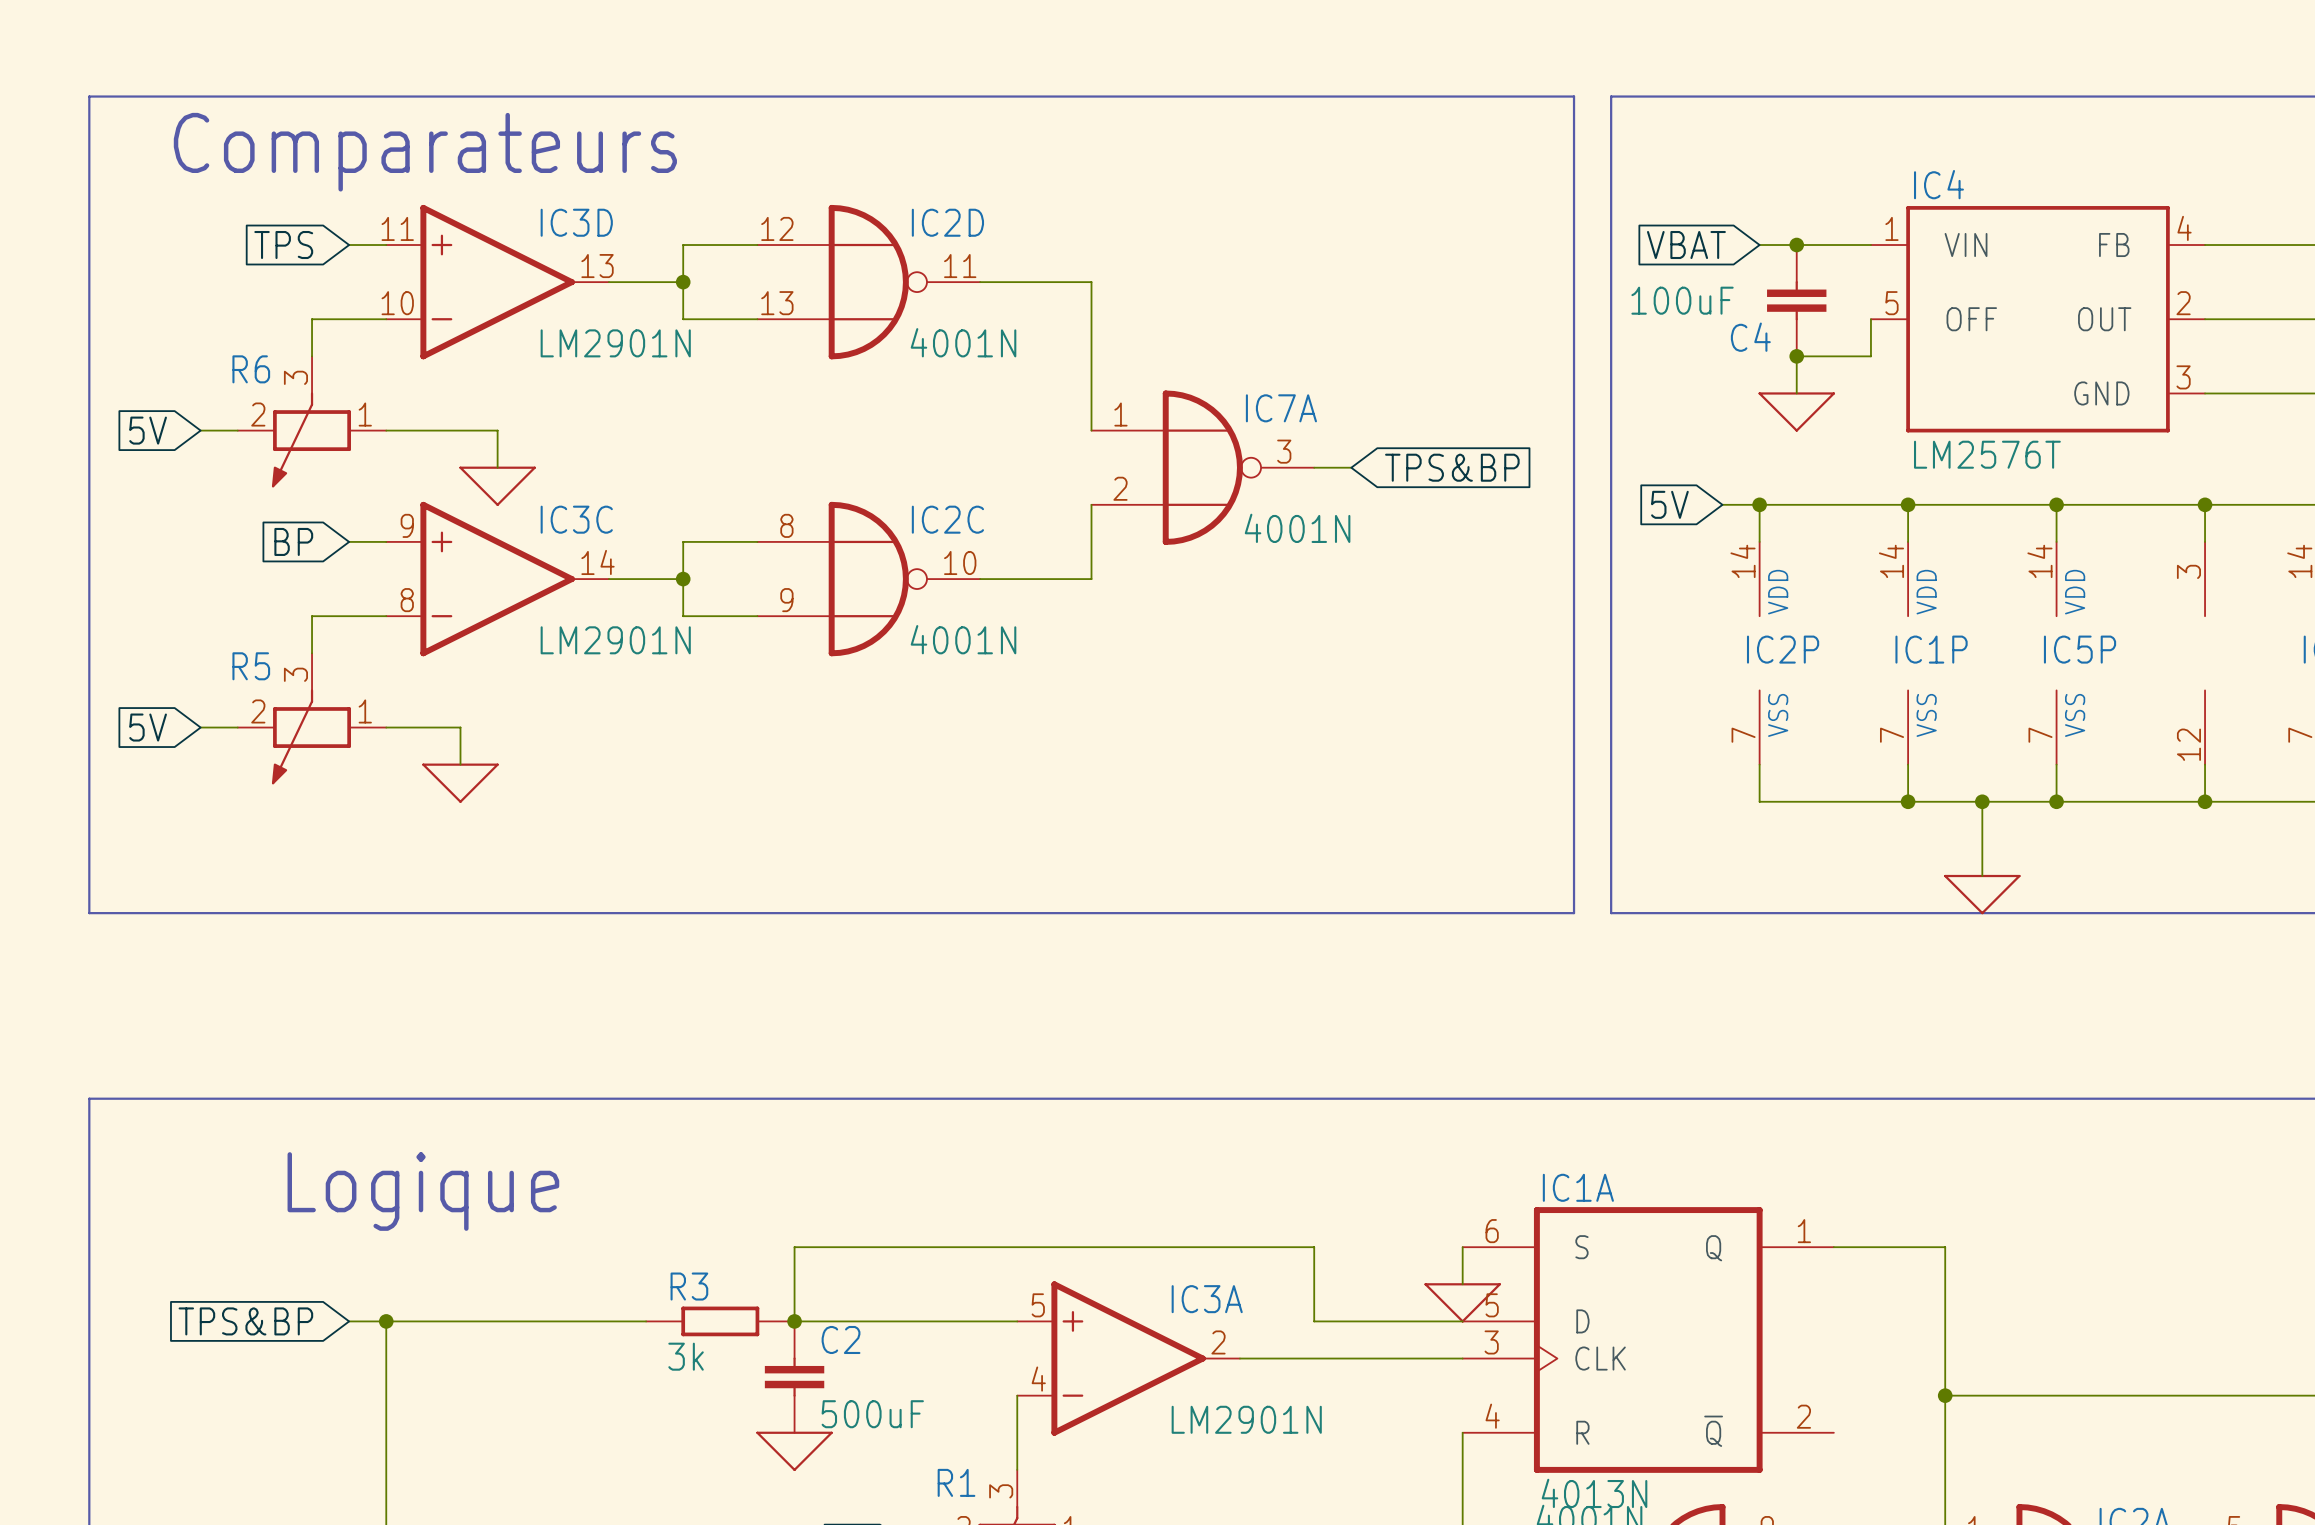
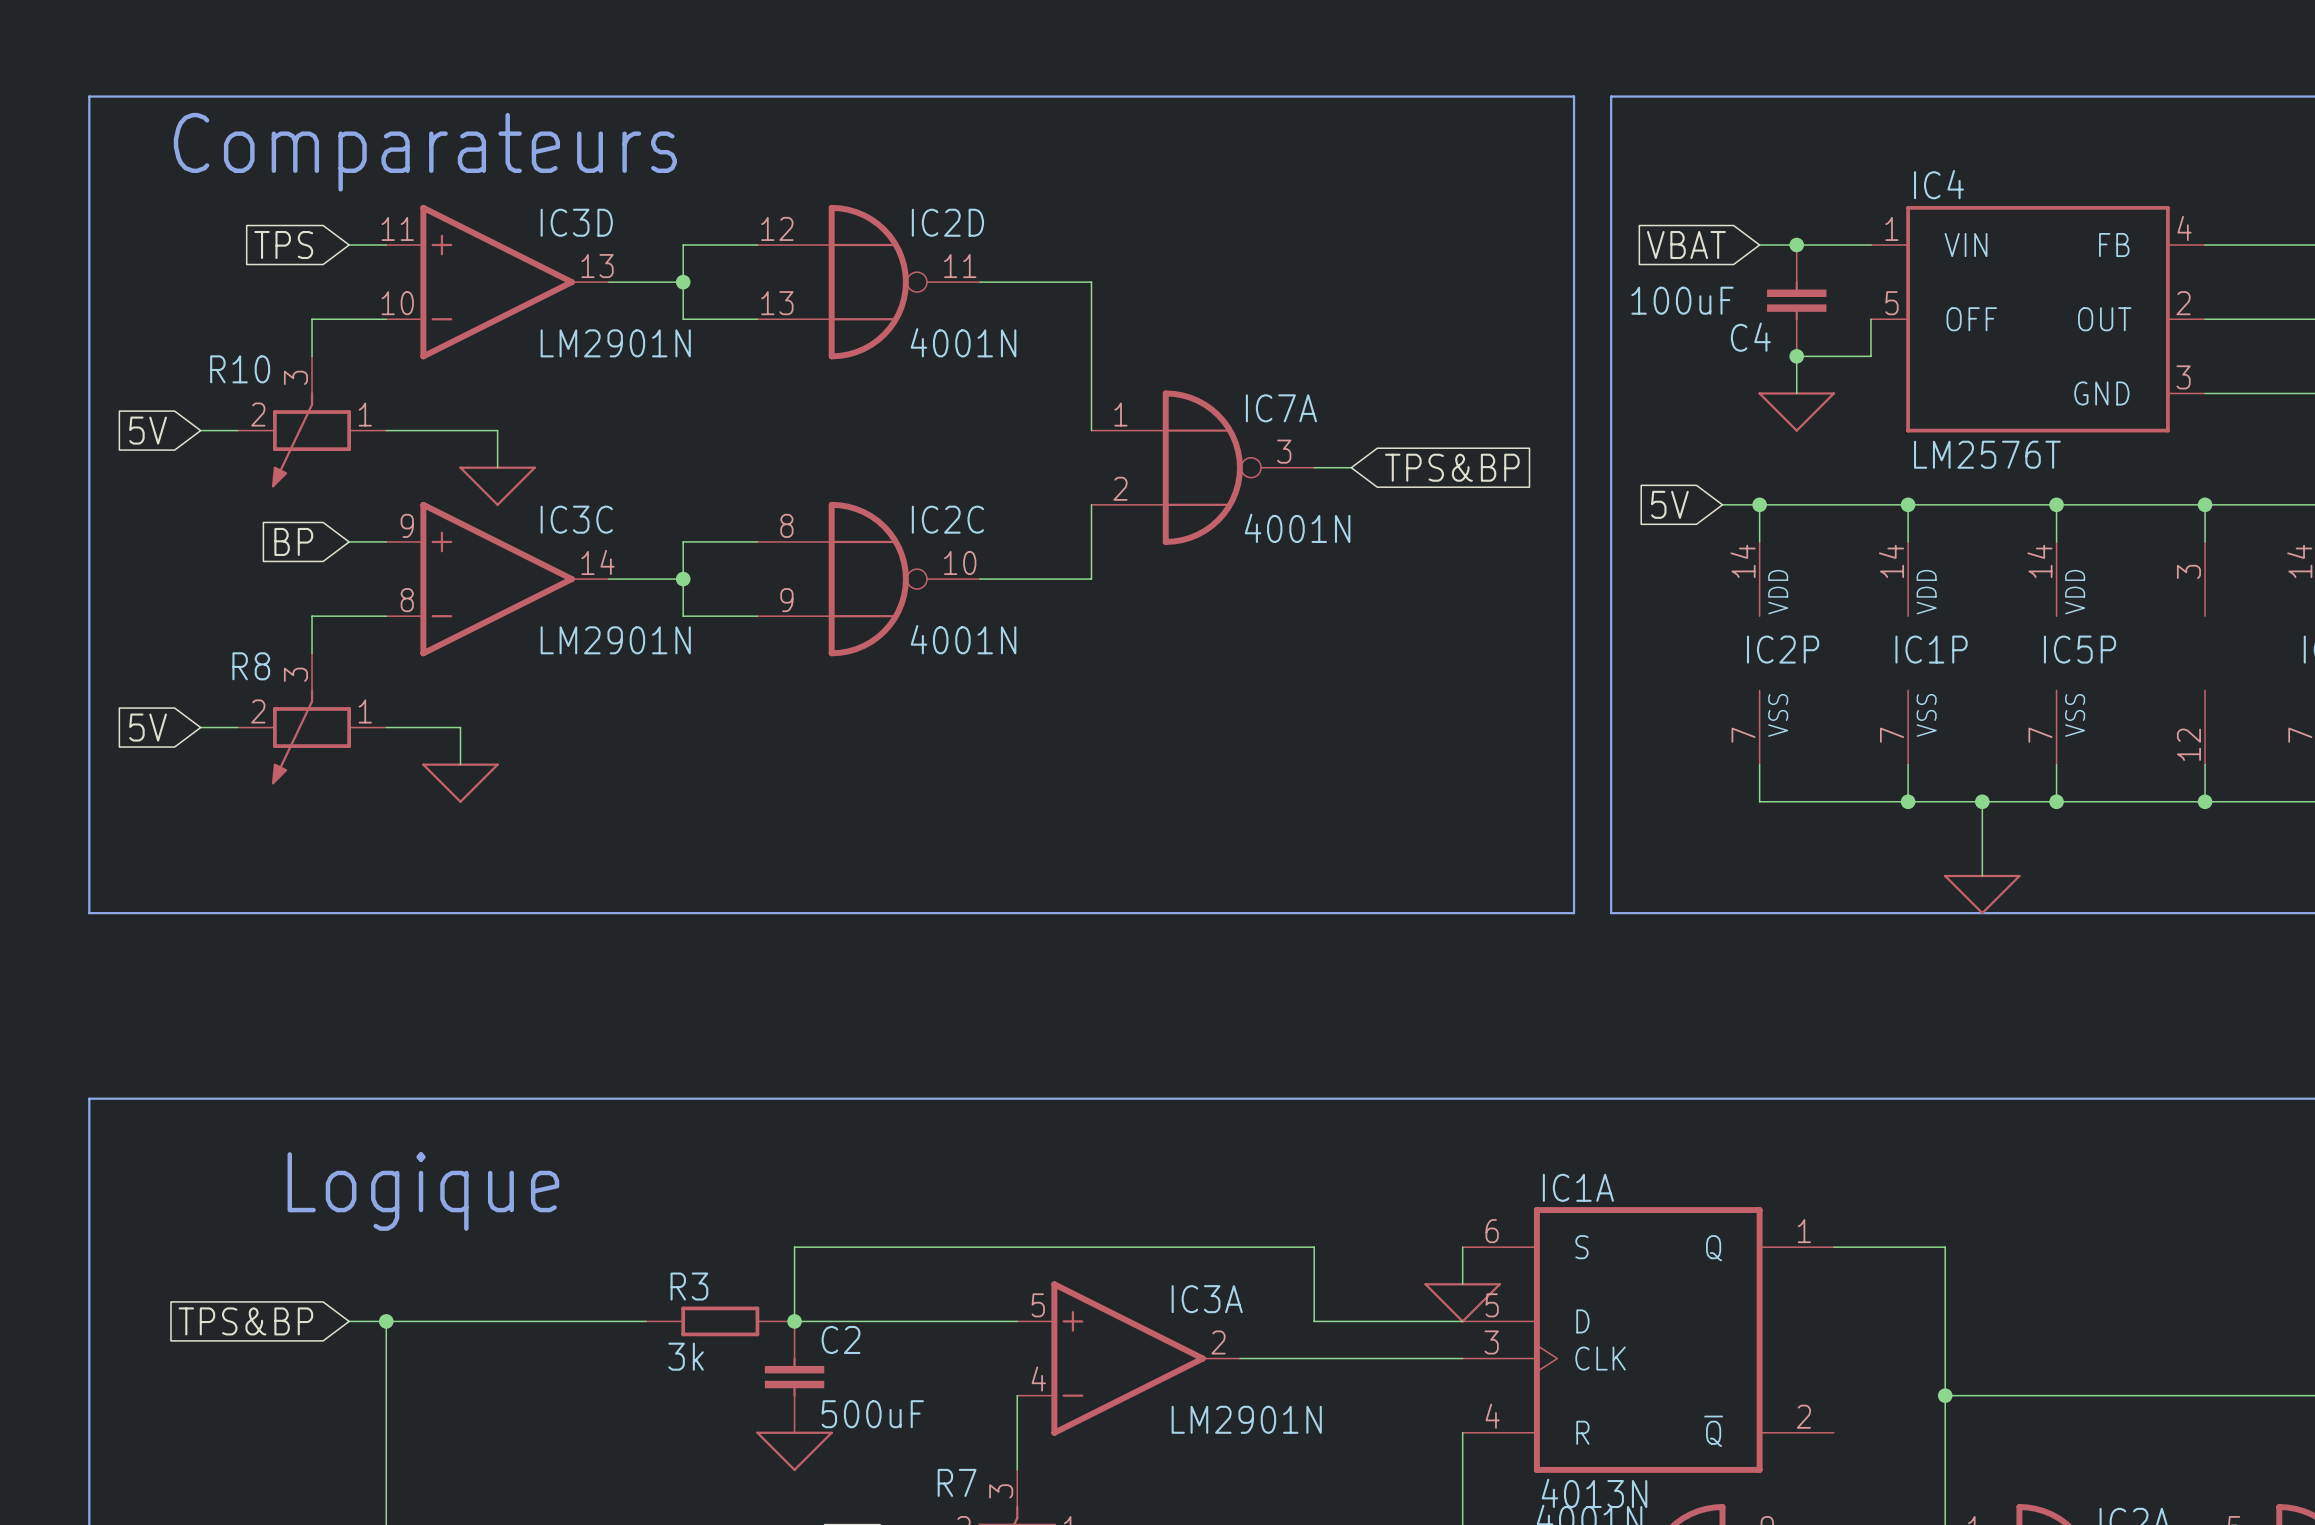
R6 name: R6 (251, 369) -> R10 (240, 369)
R5 name: R5 (251, 666) -> R8 (251, 666)
R1 name: R1 (956, 1482) -> R7 (957, 1482)

